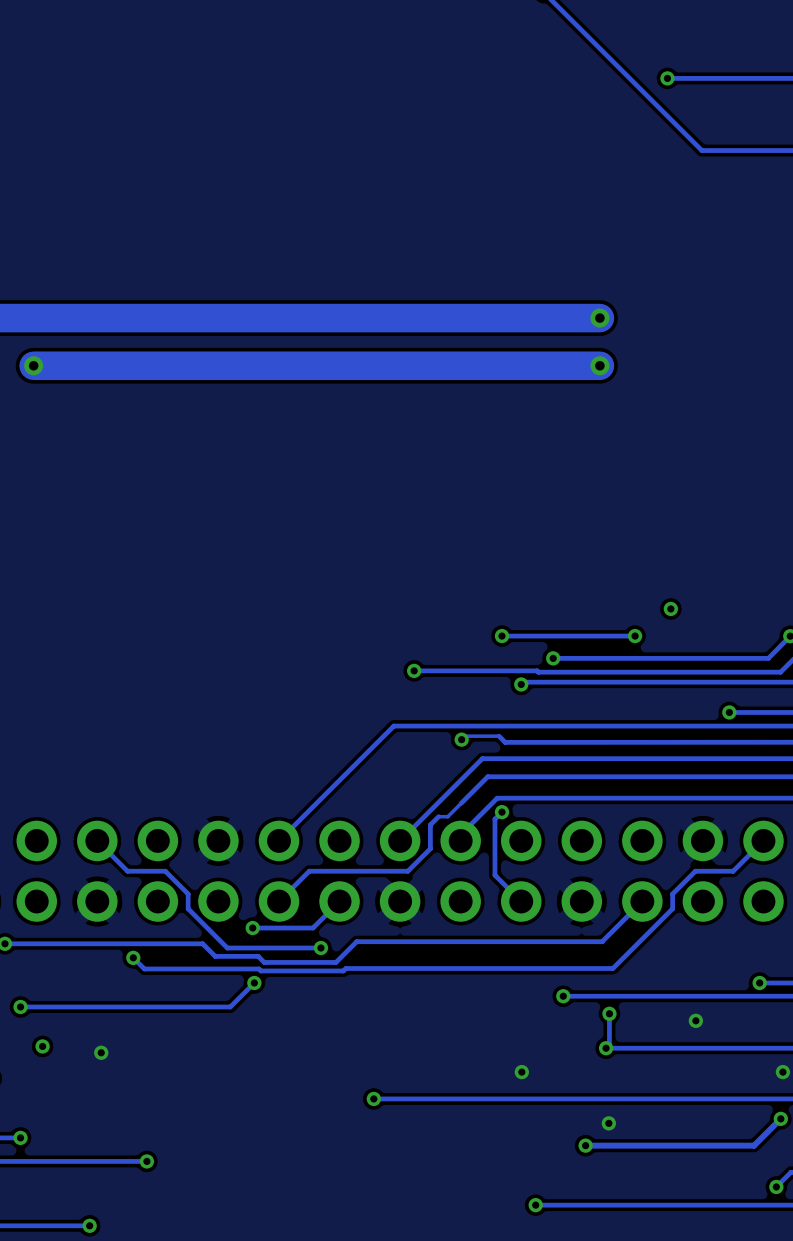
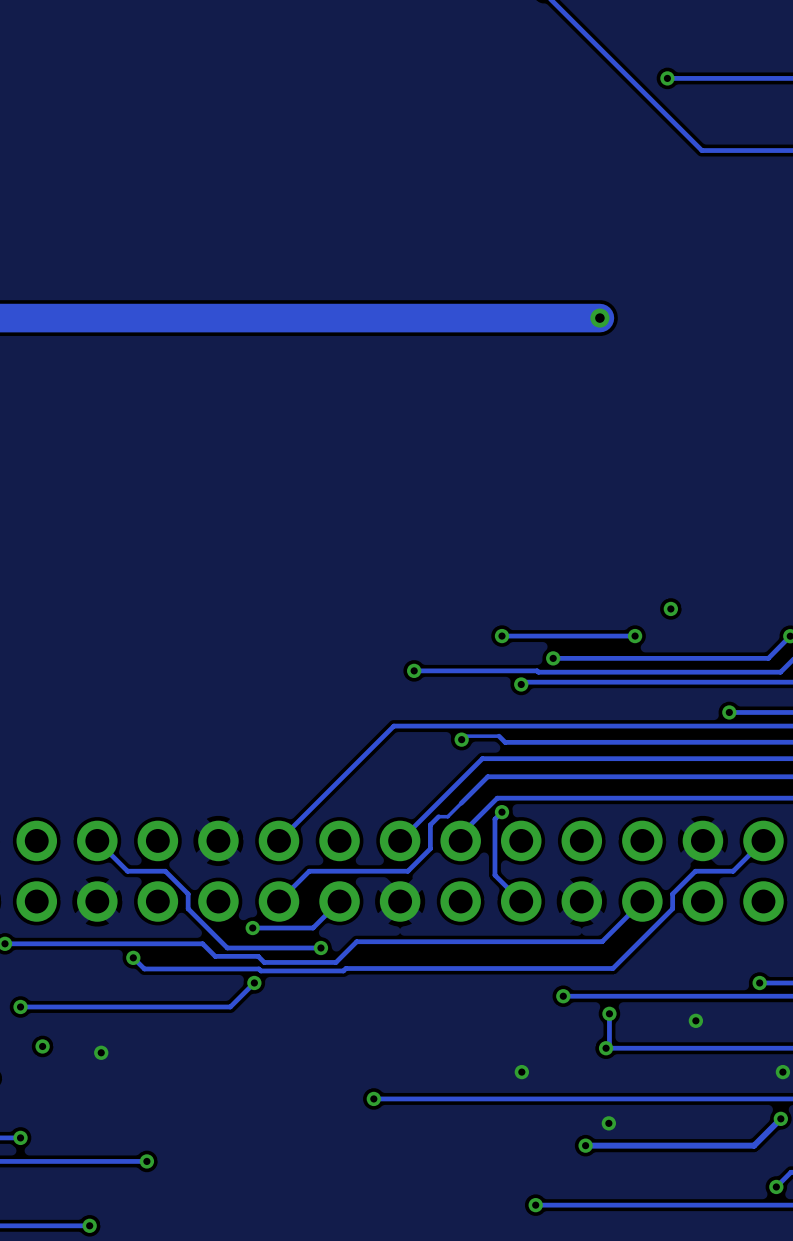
via: (33, 365) -> none
track: (599, 365) (33, 365) -> none
via: (599, 365) -> none

